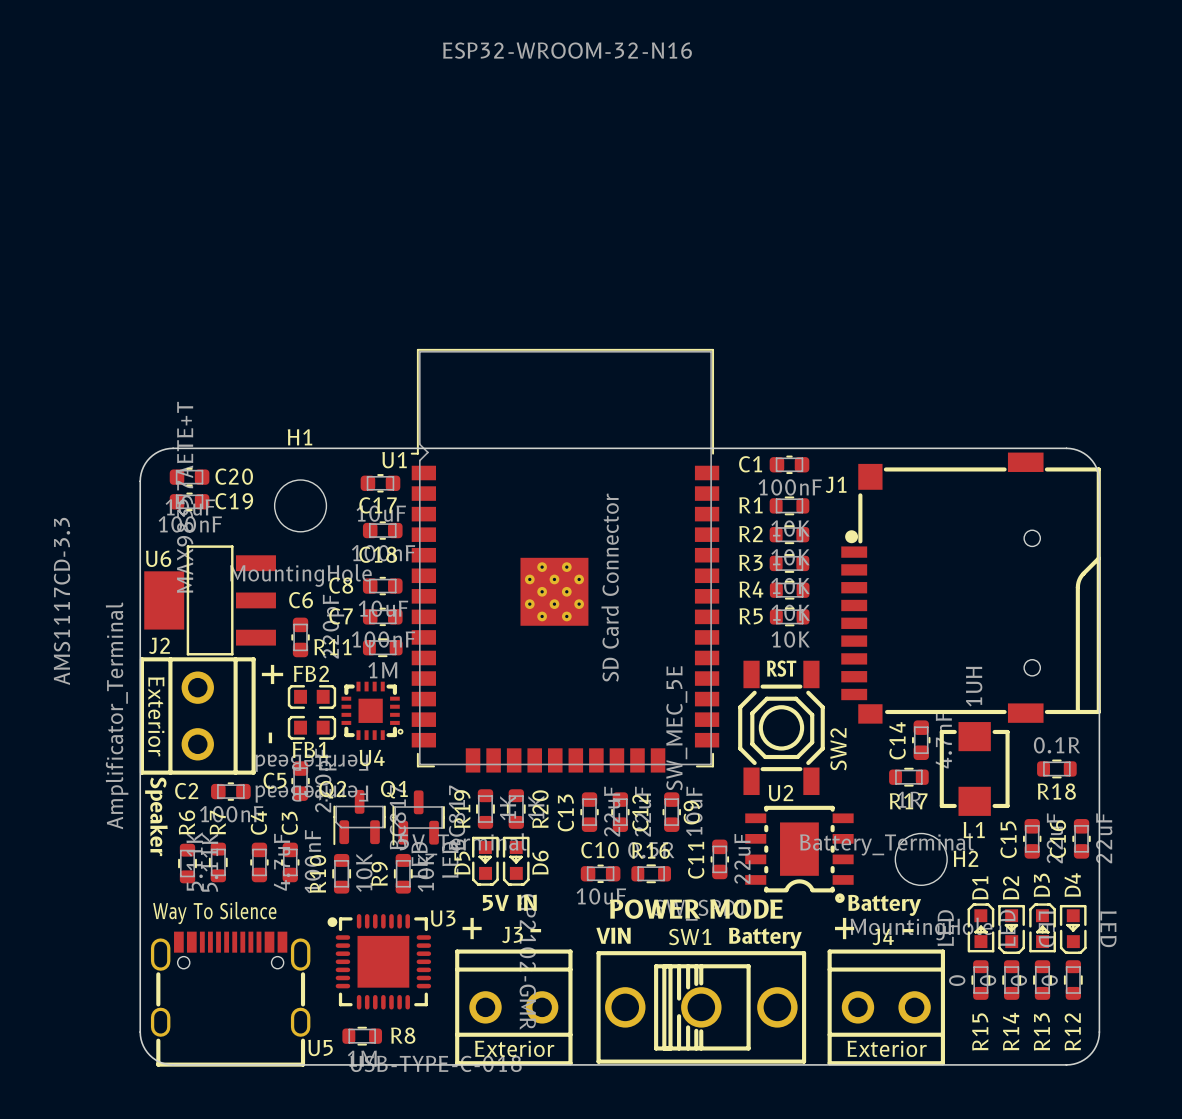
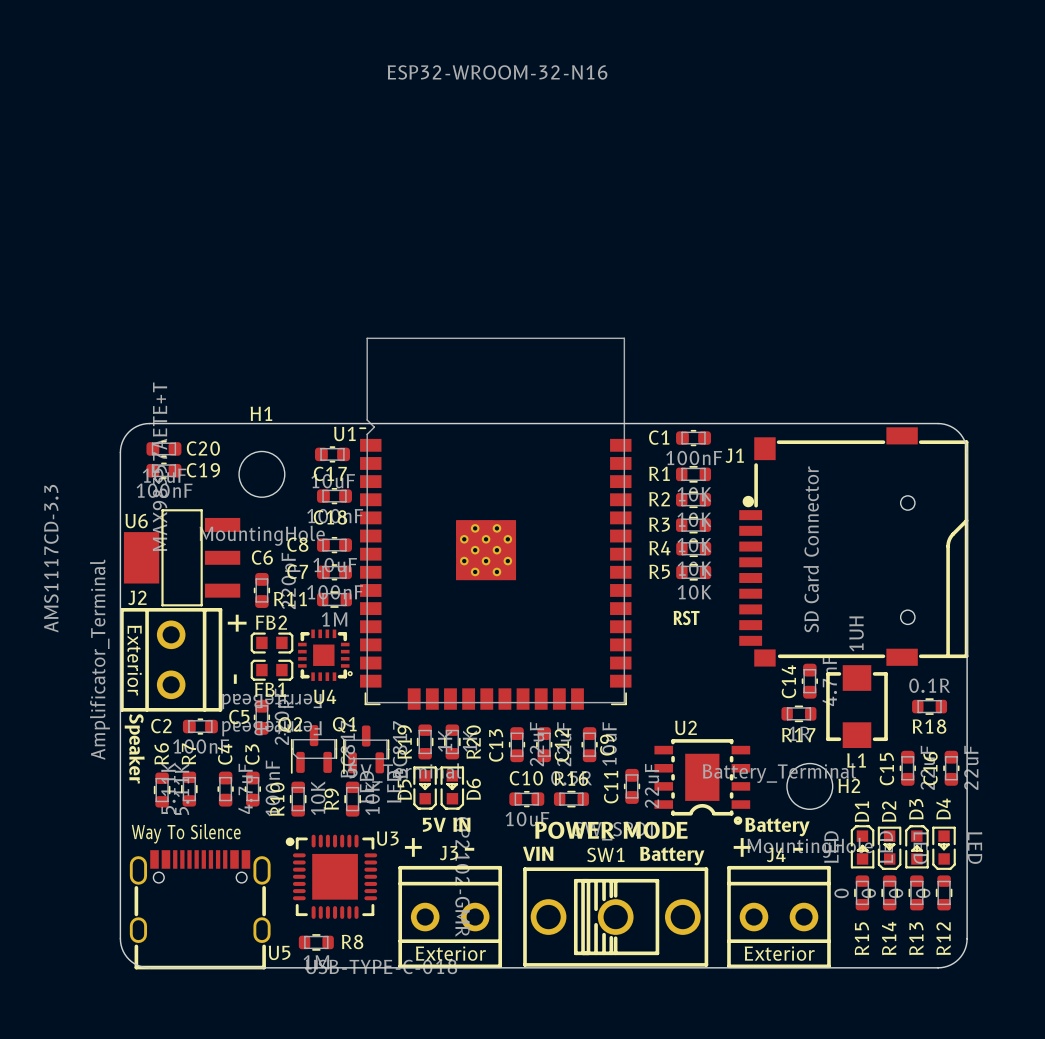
U1 footprint: [410, 348, 720, 773] -> [359, 337, 632, 710]
J1 value position: SD Card Connector (610, 587) -> SD Card Connector (811, 549)
SW2: SW_MEC_5E (781, 727) -> none

